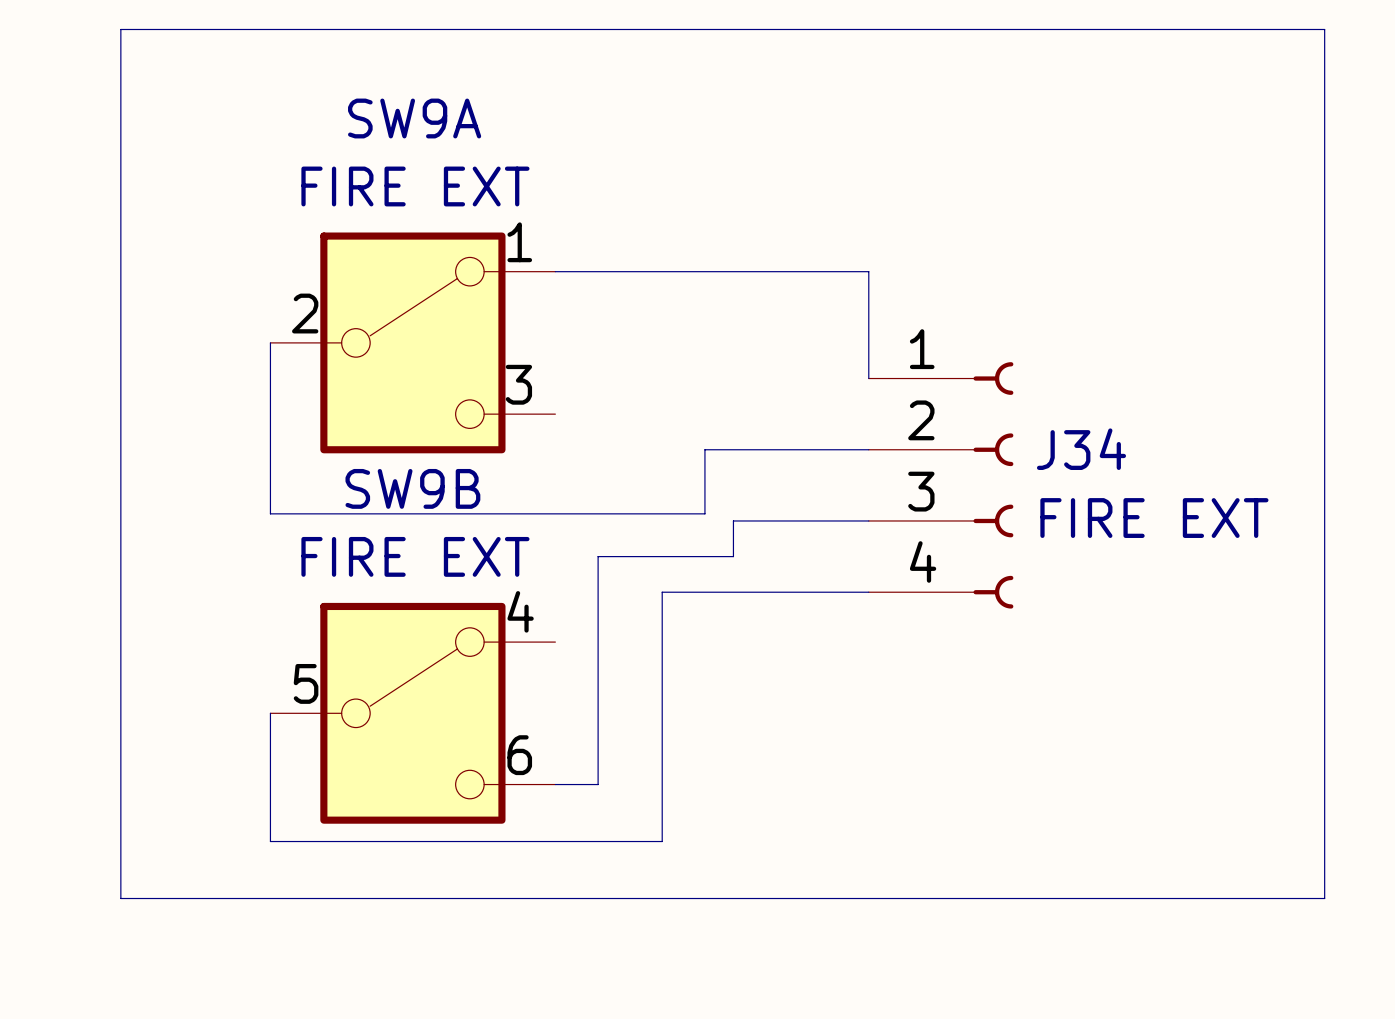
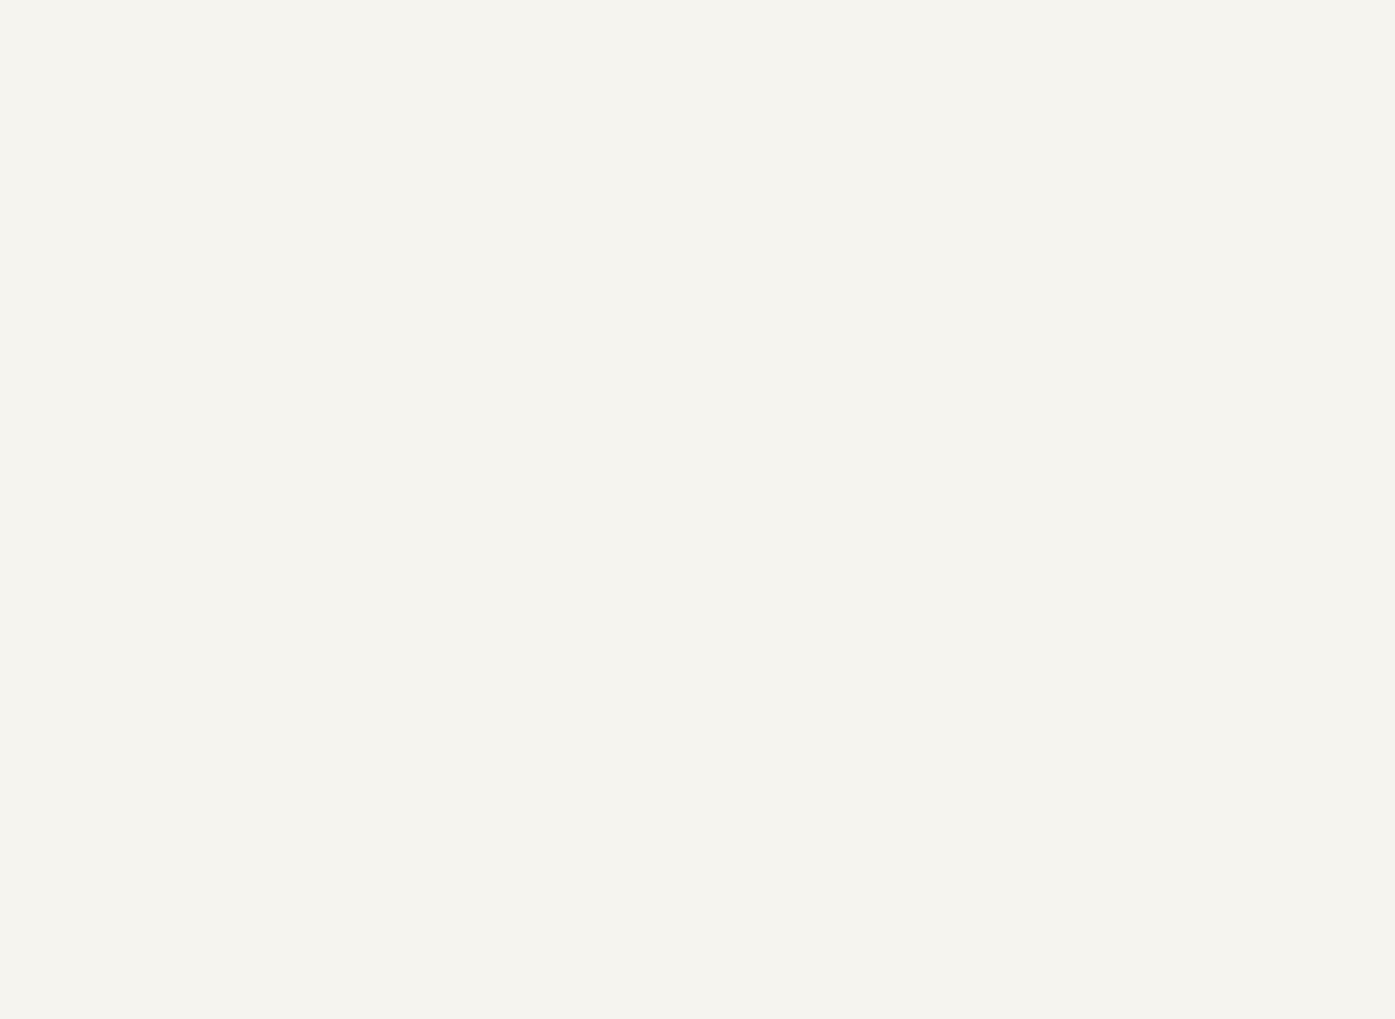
line: (120, 29) (1324, 29) (1324, 898) (120, 898) (120, 29) -> none
wire: (555, 271) (868, 271) (868, 378) -> none
wire: (270, 342) (270, 513) (704, 513) (704, 449) (868, 449) -> none
SW9A: FIRE EXT (412, 342) -> none
J34: FIRE EXT (941, 485) -> none
wire: (868, 520) (733, 520) (733, 556) (598, 556) (598, 784) (555, 784) -> none
wire: (868, 592) (662, 592) (662, 841) (270, 841) (270, 713) -> none
SW9B: FIRE EXT (412, 713) -> none

